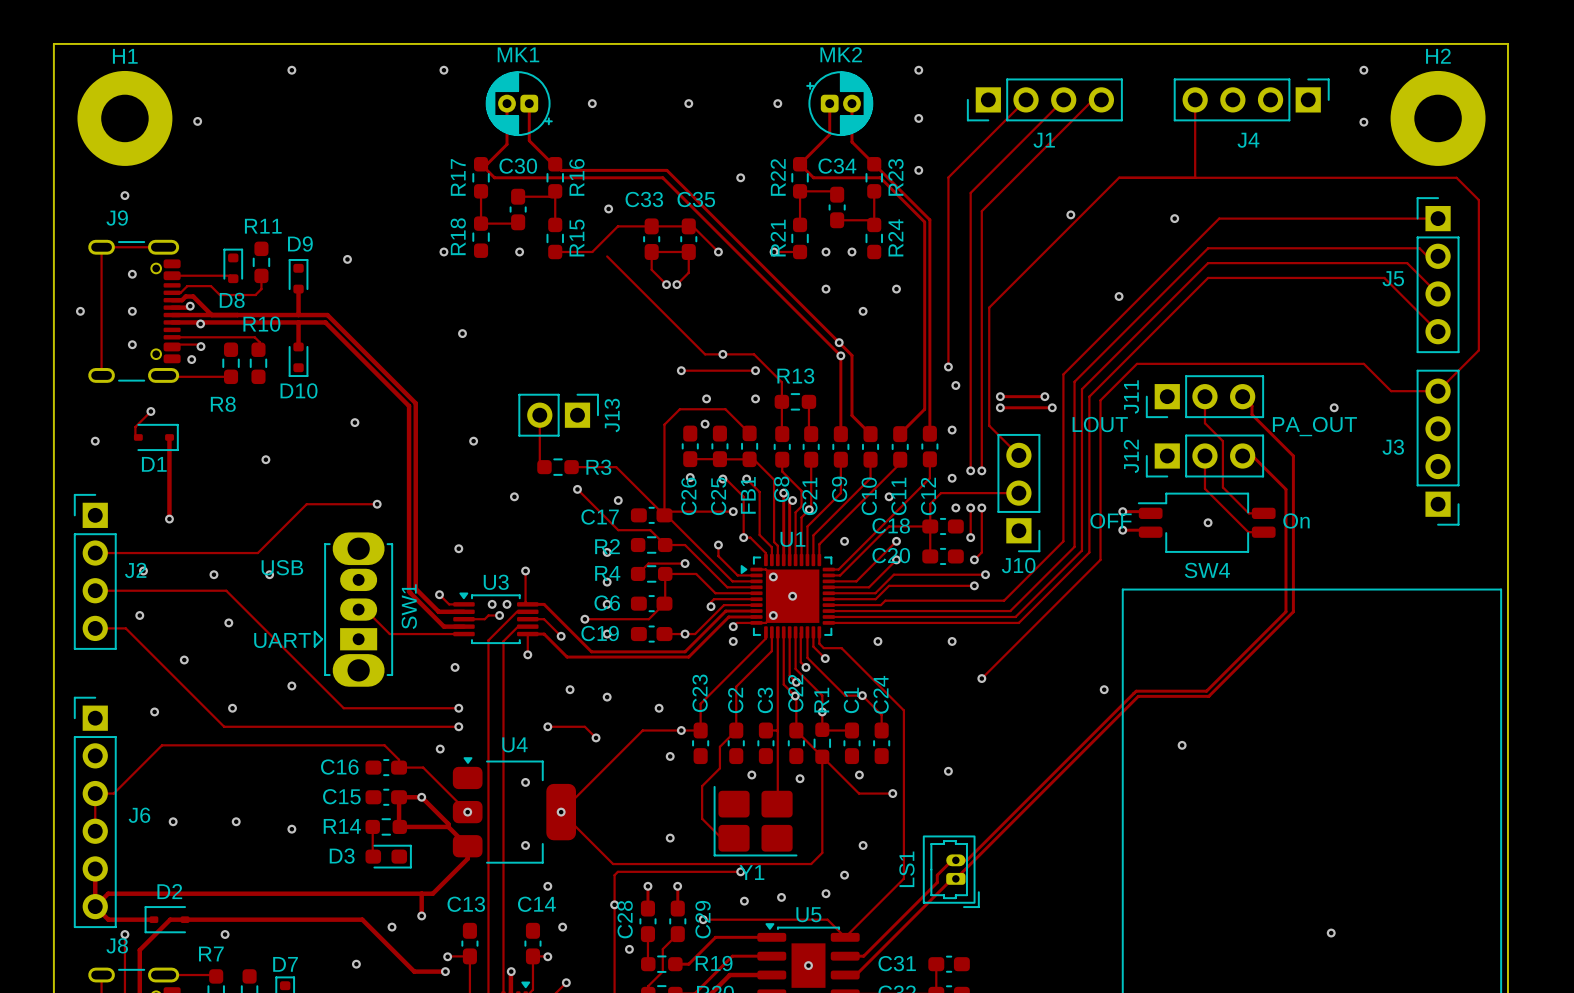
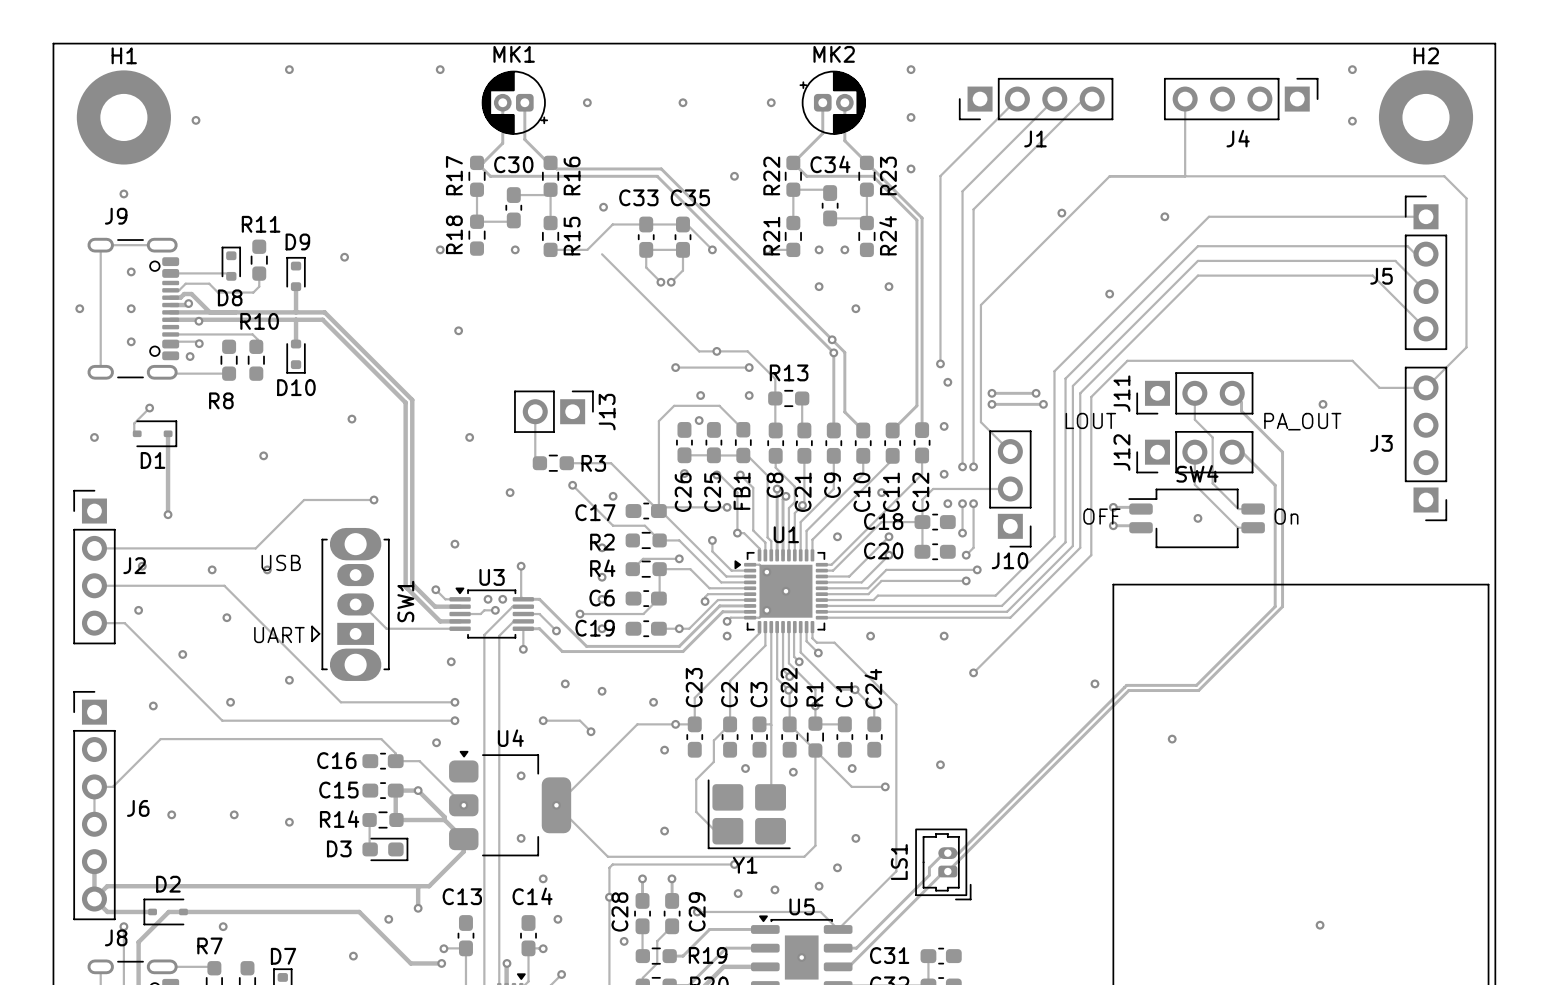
SW4 name position: SW4 (1207, 570) -> SW4 (1197, 473)

